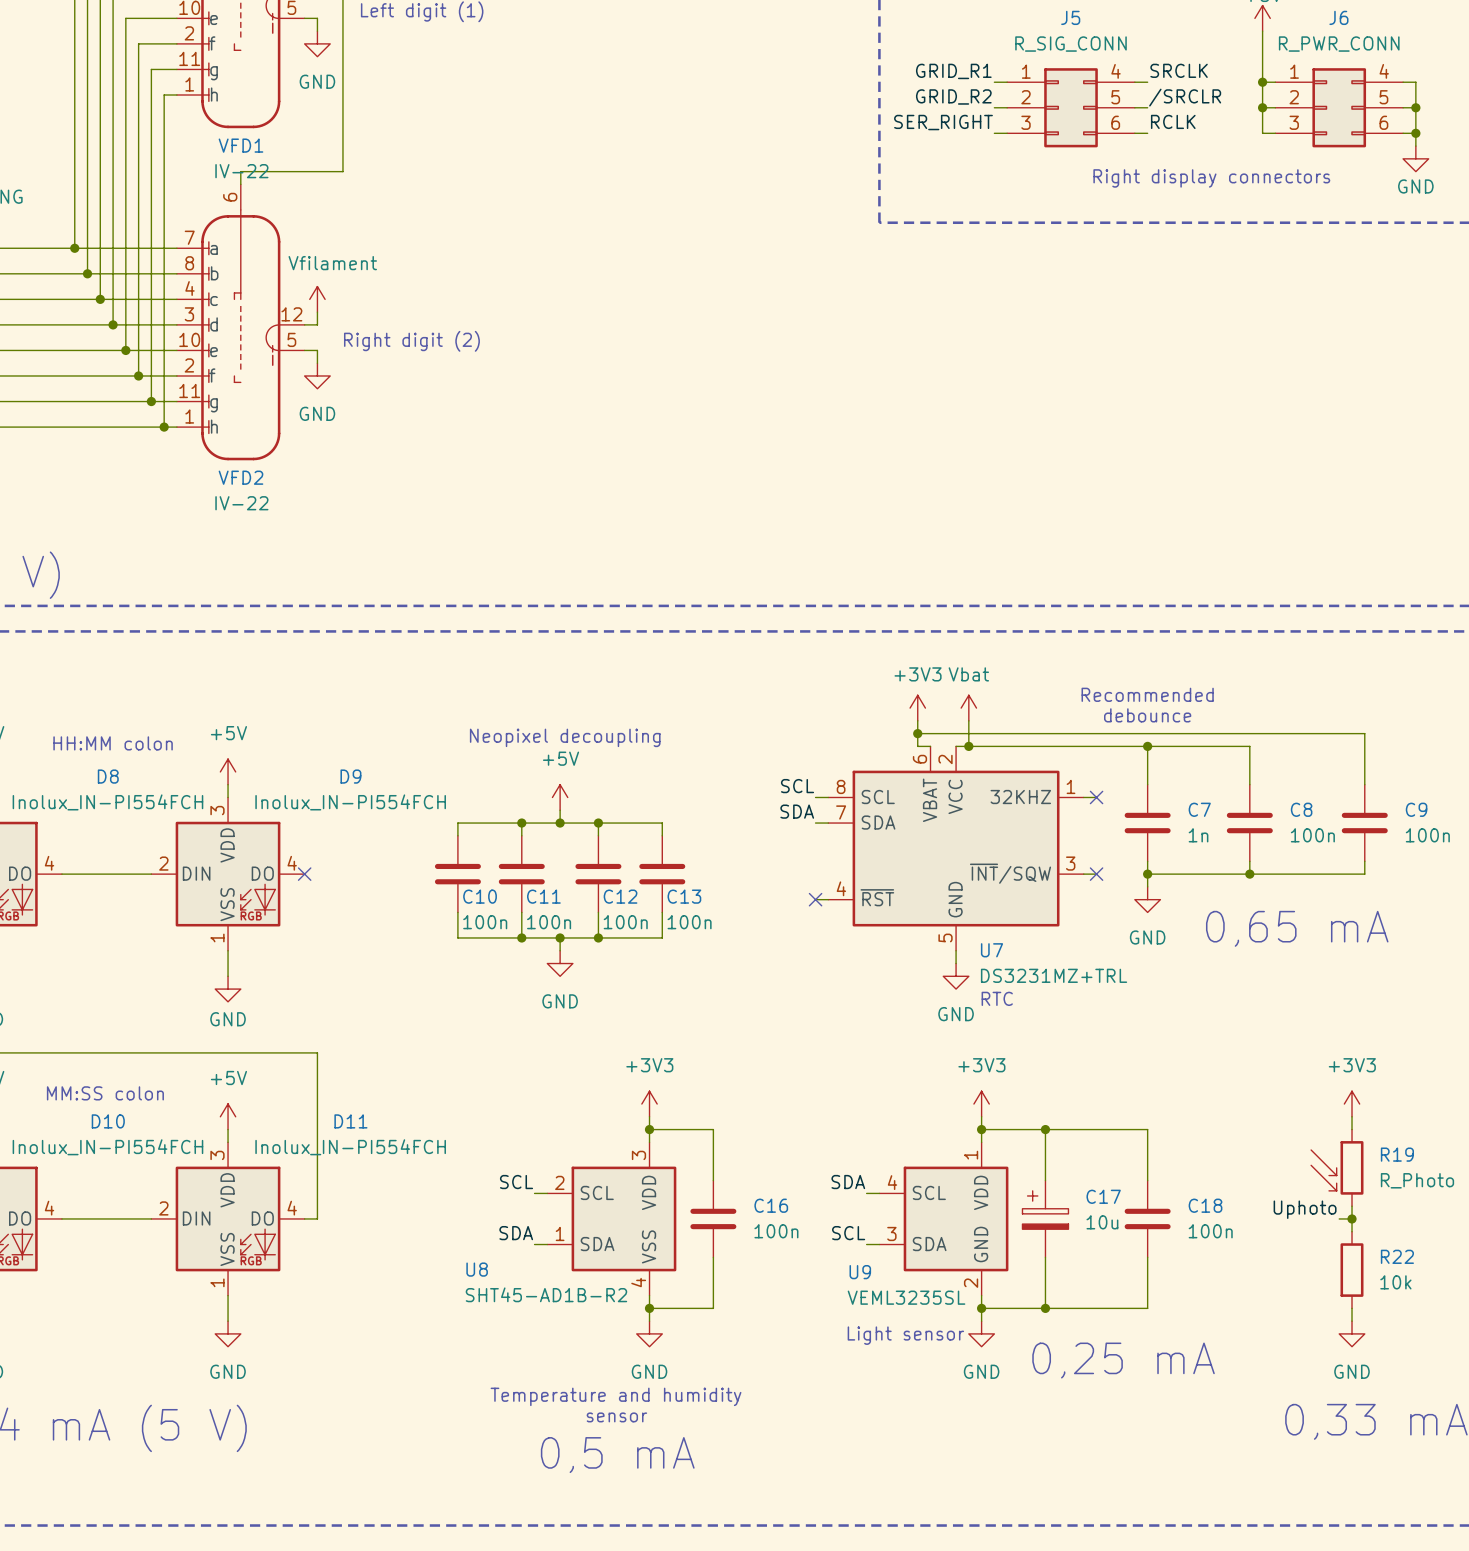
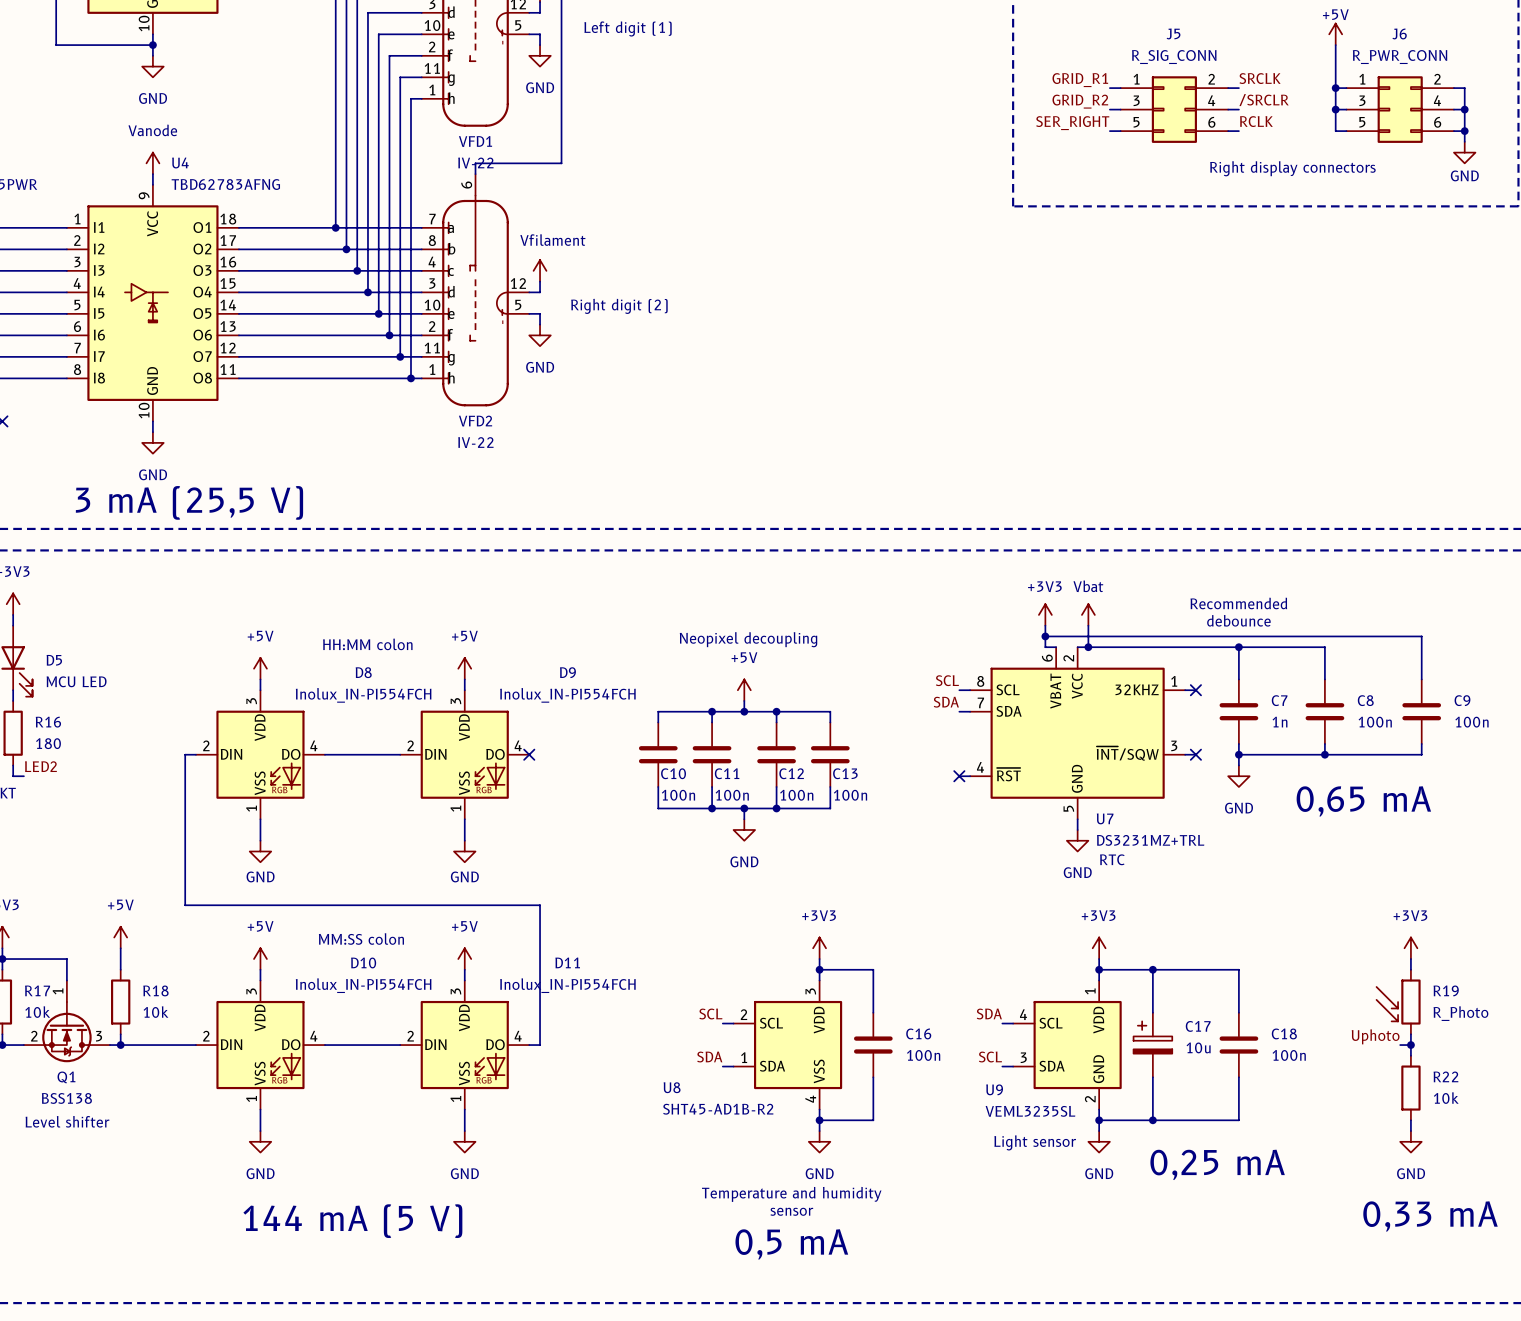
J5 pin number: 4 (1116, 71) -> 2 (1211, 79)
J6 pin number: 4 (1384, 71) -> 2 (1437, 79)
J5 pin number: 2 (1026, 97) -> 3 (1136, 100)
J5 pin number: 5 (1115, 97) -> 4 (1211, 100)
J6 pin number: 2 (1294, 97) -> 3 (1362, 100)
J6 pin number: 5 (1383, 97) -> 4 (1437, 100)
J5 pin number: 3 (1026, 122) -> 5 (1136, 122)
J6 pin number: 3 (1294, 122) -> 5 (1362, 122)

